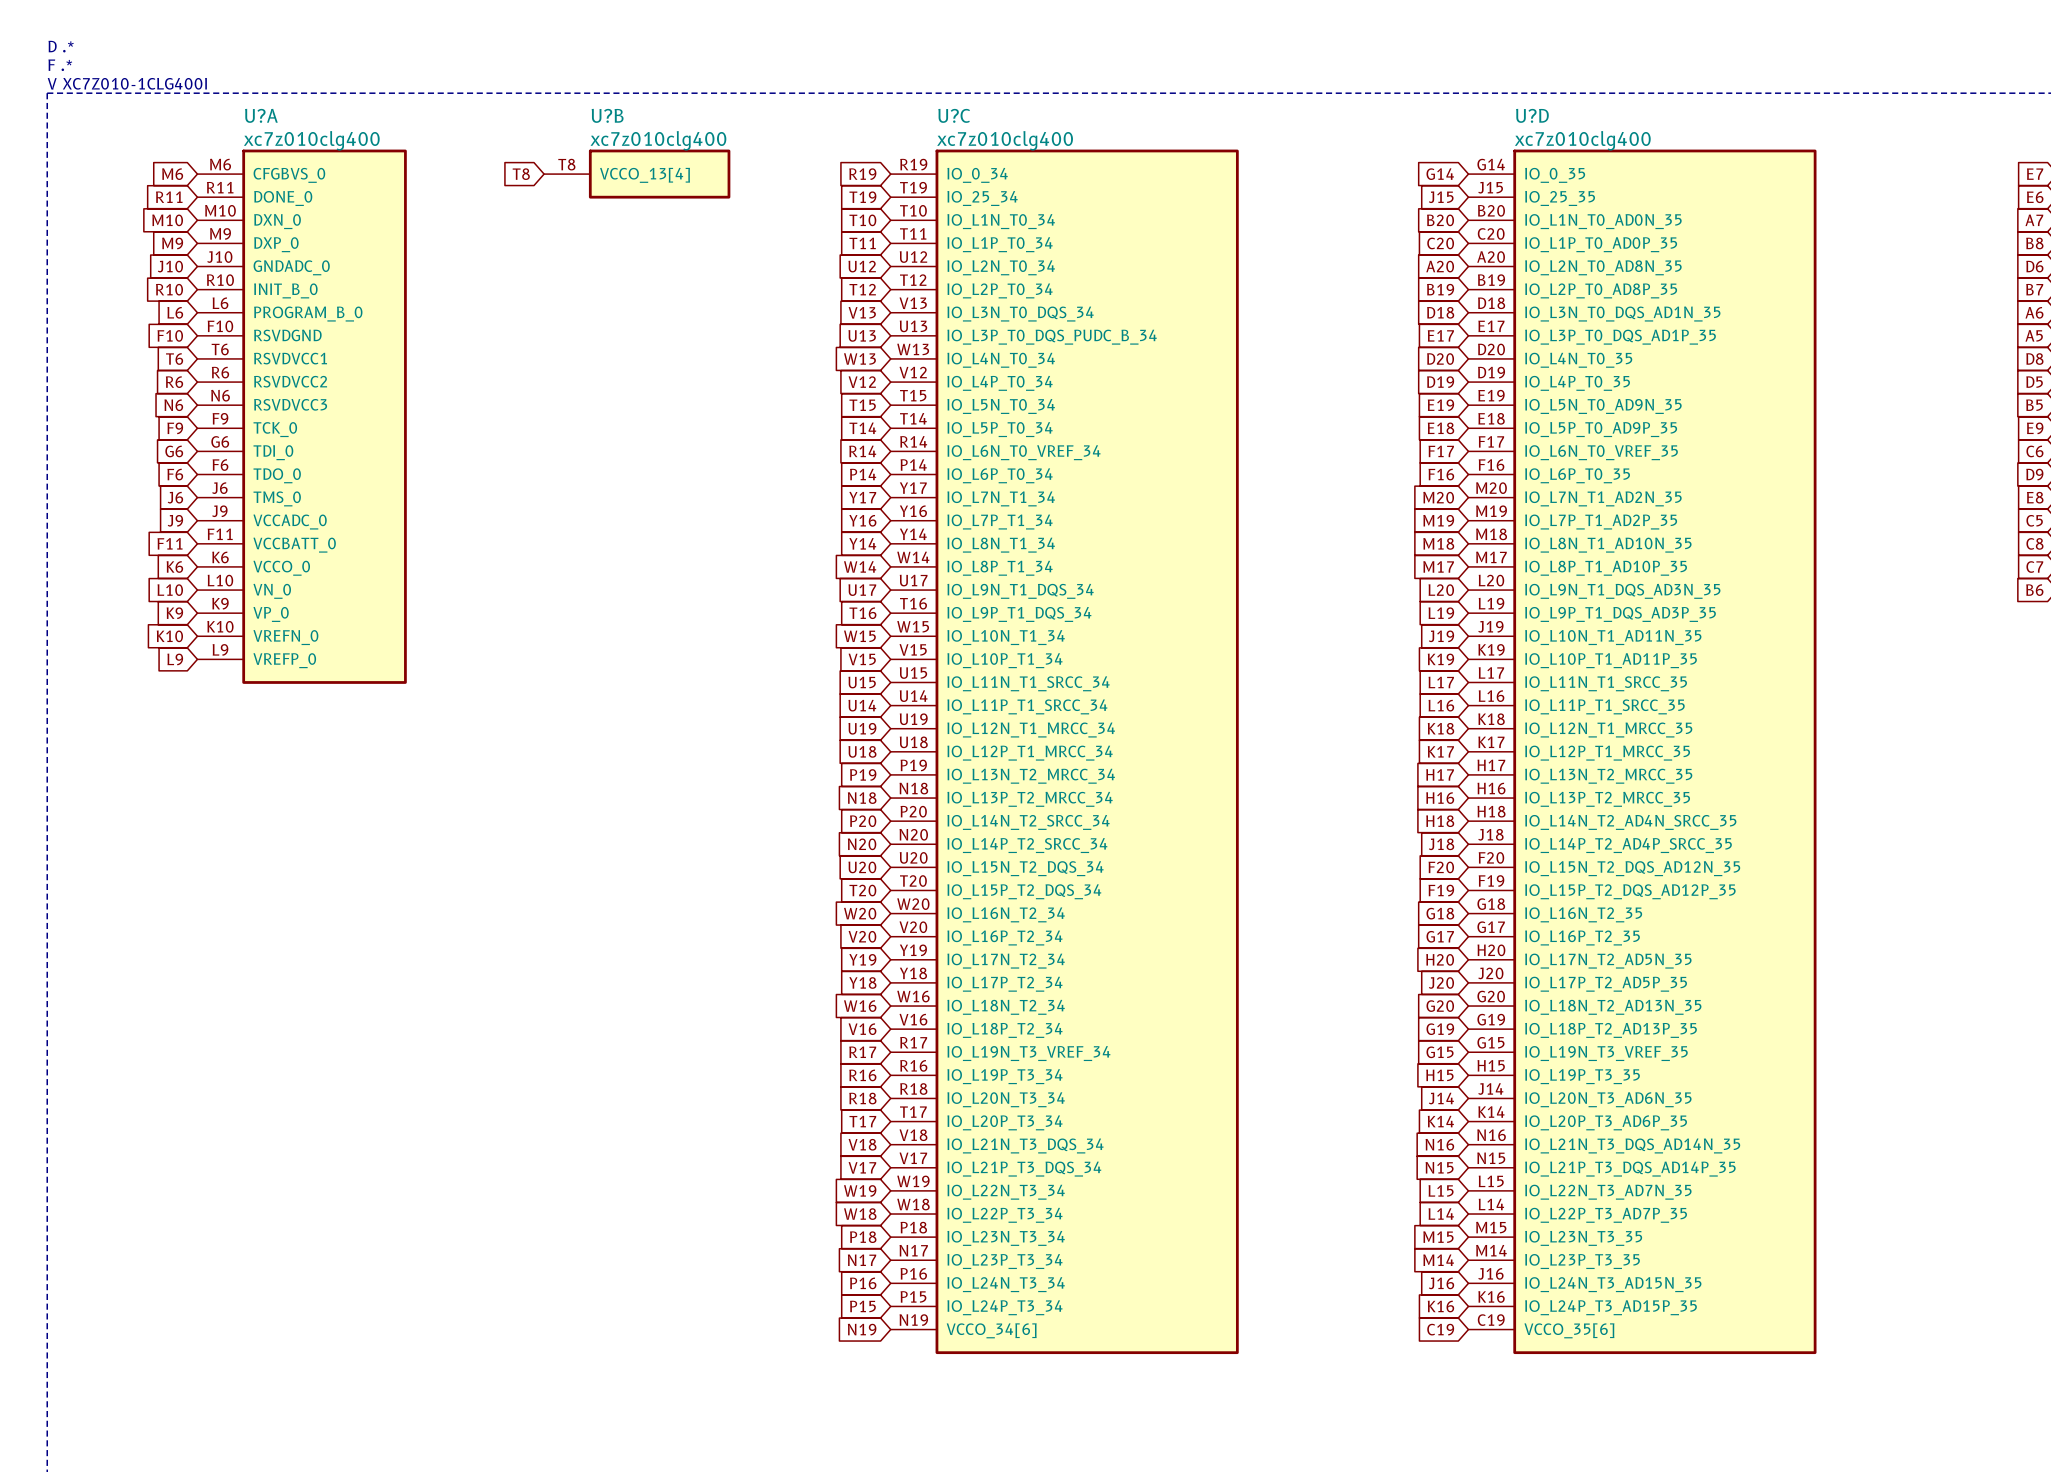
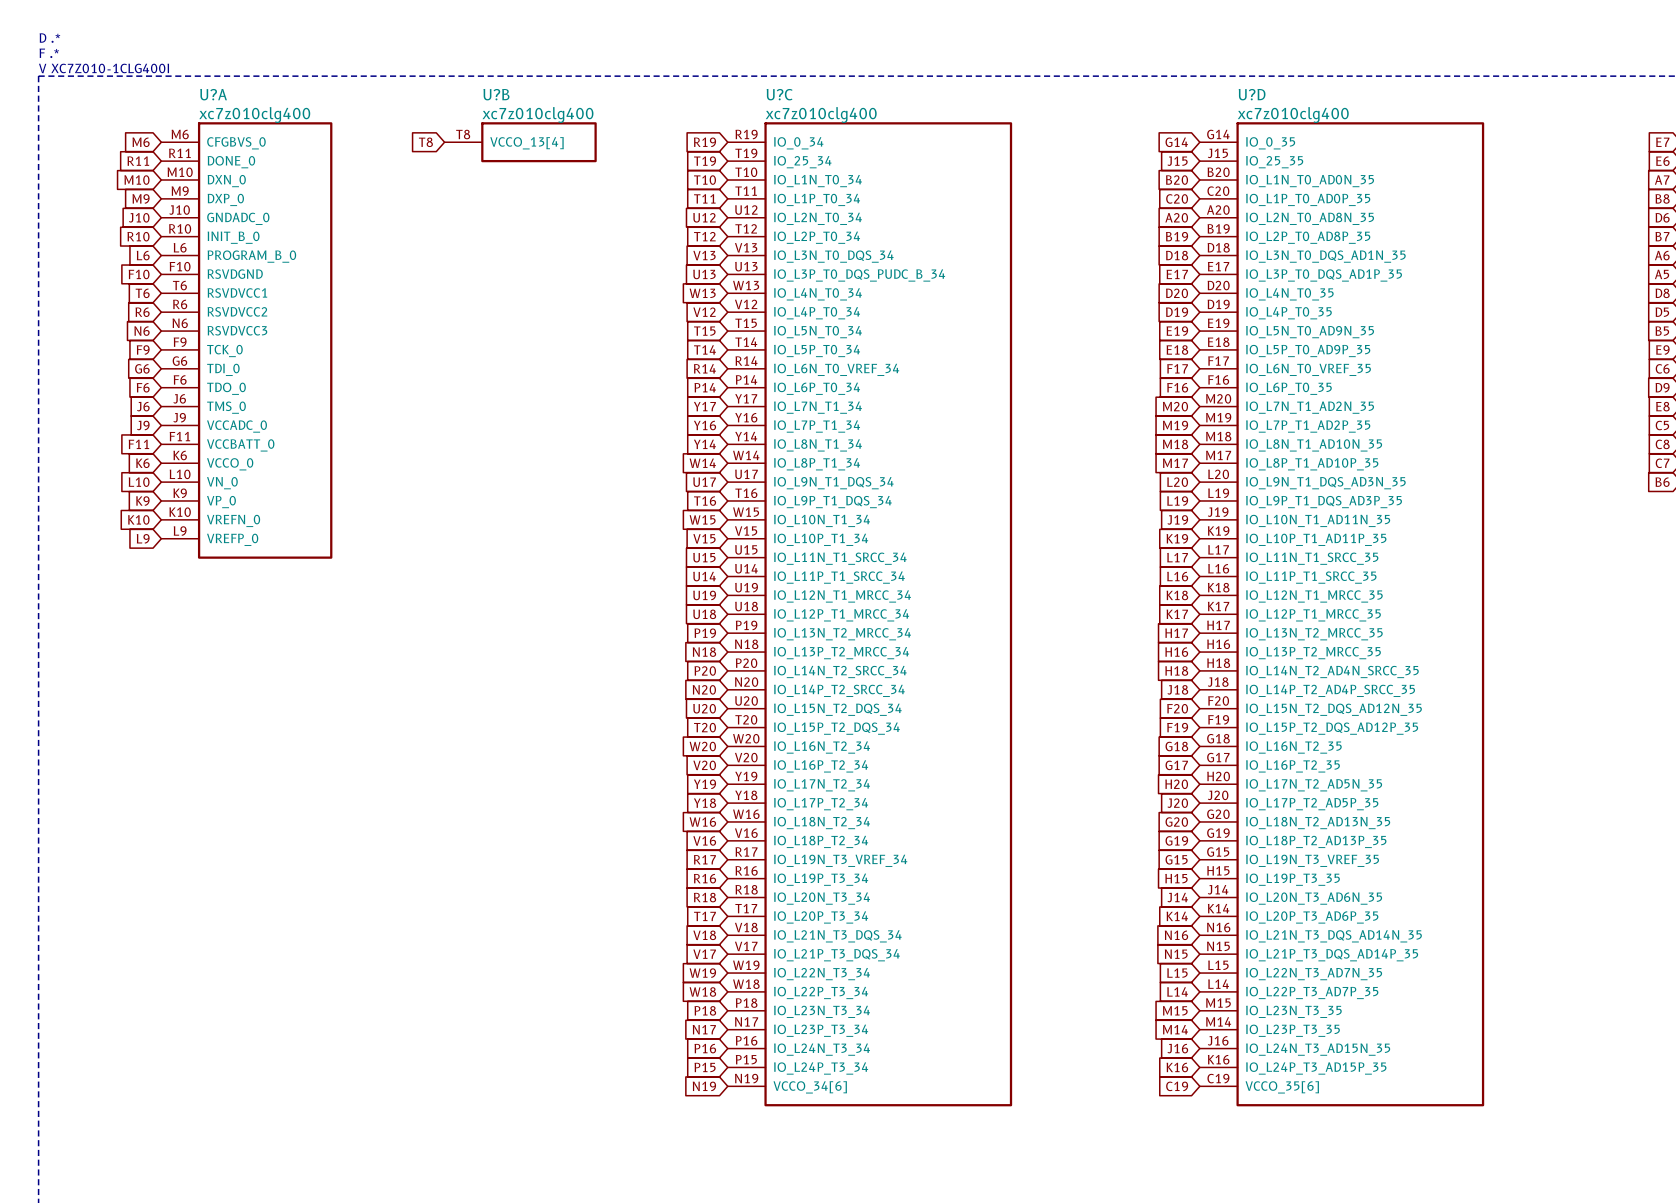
U?A symbol: [197, 149, 407, 684] -> [161, 122, 333, 559]
U?B symbol: [544, 149, 731, 199] -> [444, 122, 597, 163]
U?C symbol: [890, 149, 1239, 1355] -> [727, 122, 1013, 1107]
U?D symbol: [1468, 149, 1817, 1355] -> [1199, 122, 1485, 1107]

